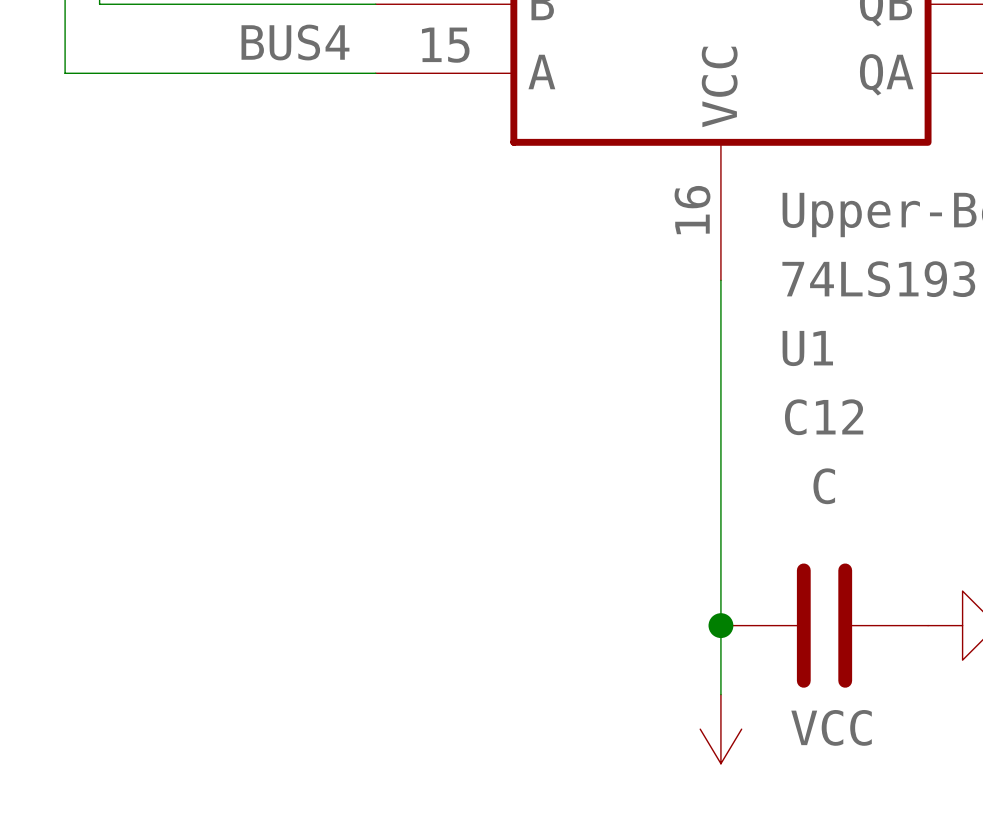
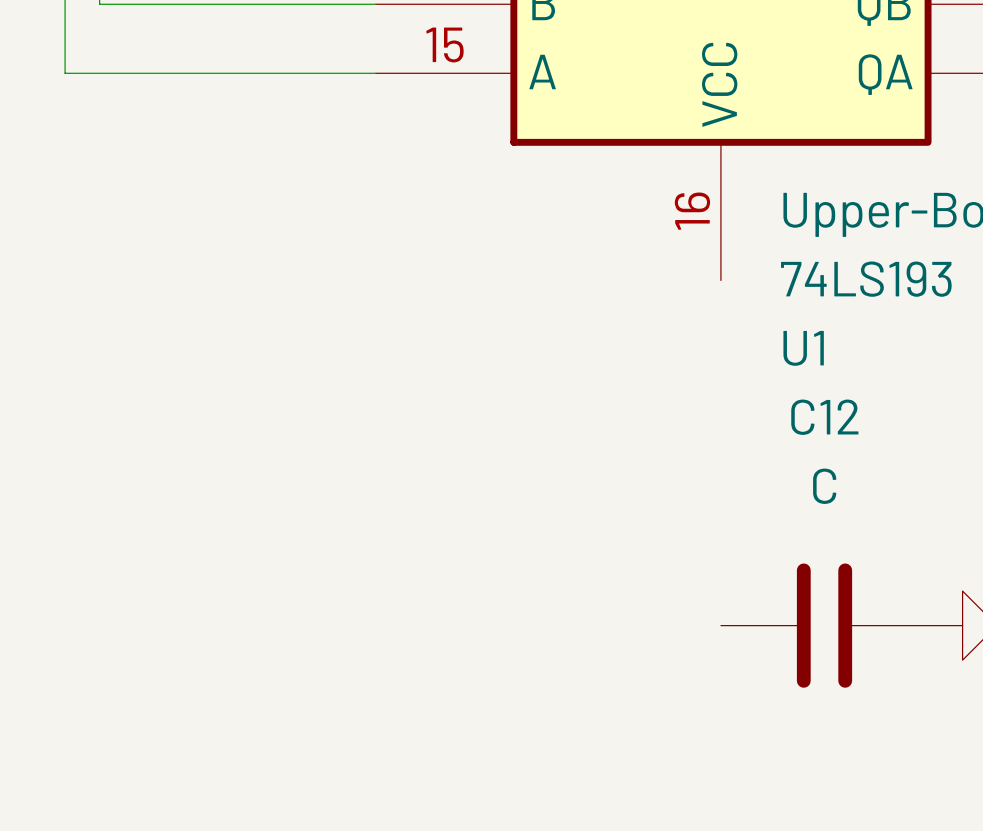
label: BUS4 (295, 42) -> none
wire: (720, 280) (720, 694) -> none
junction: (720, 625) -> none
power symbol: VCC (720, 729) -> none

